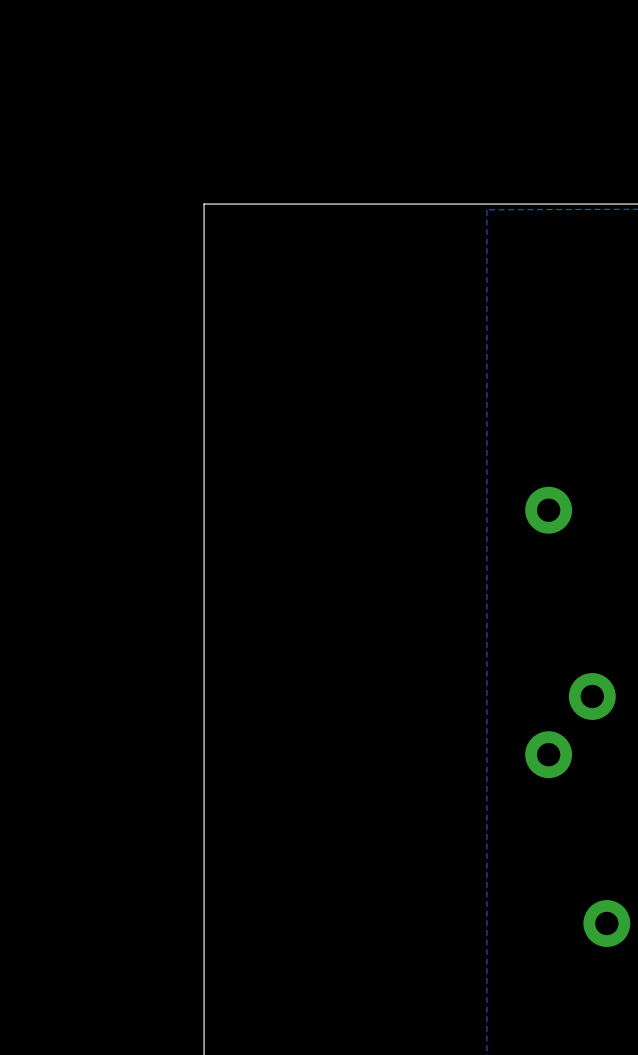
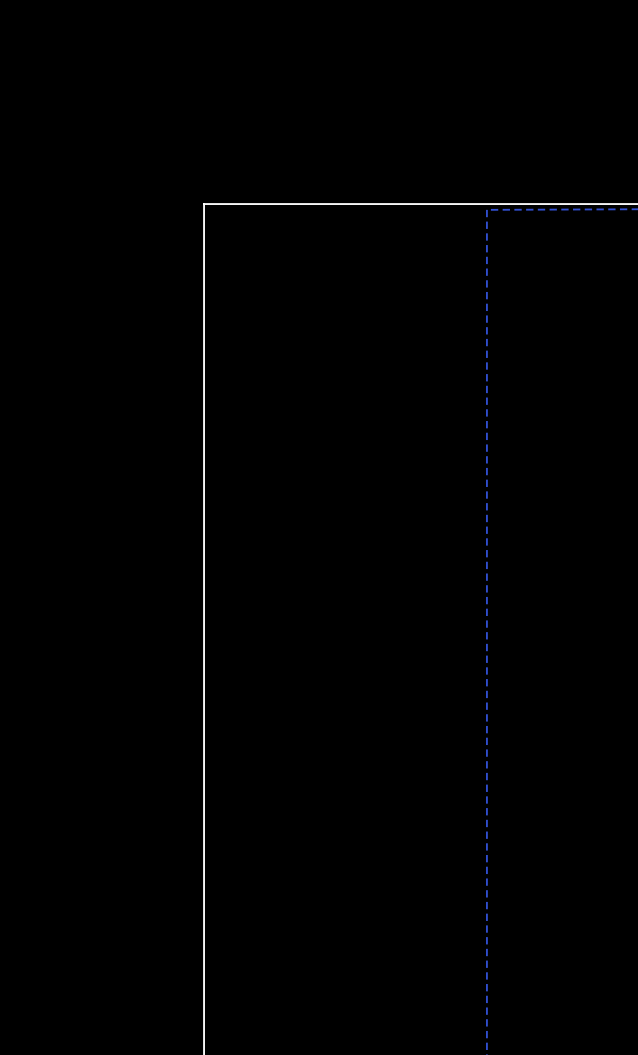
via: (548, 510) -> none
via: (592, 696) -> none
via: (548, 754) -> none
via: (606, 923) -> none

